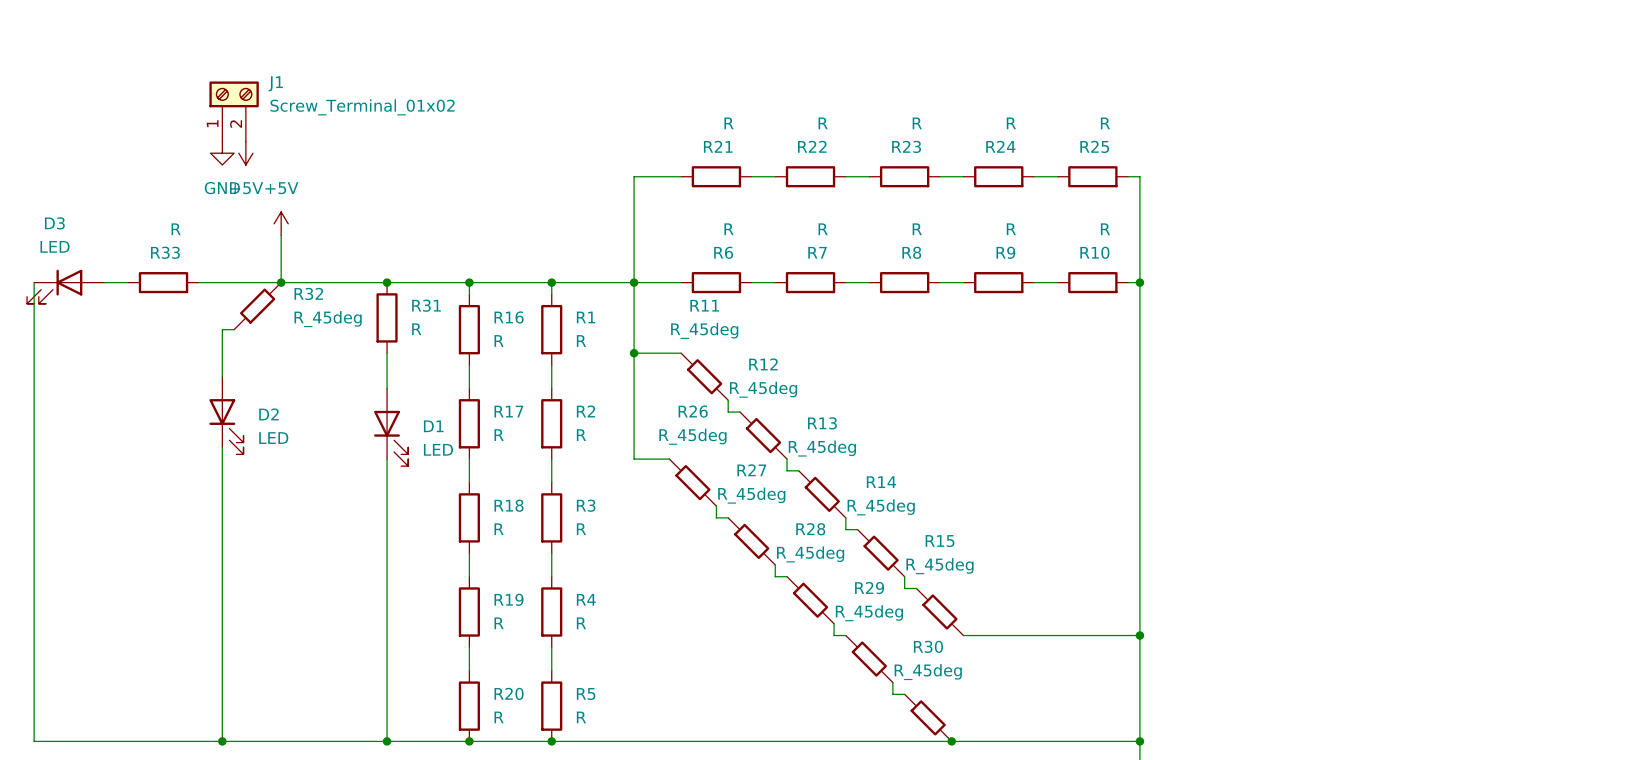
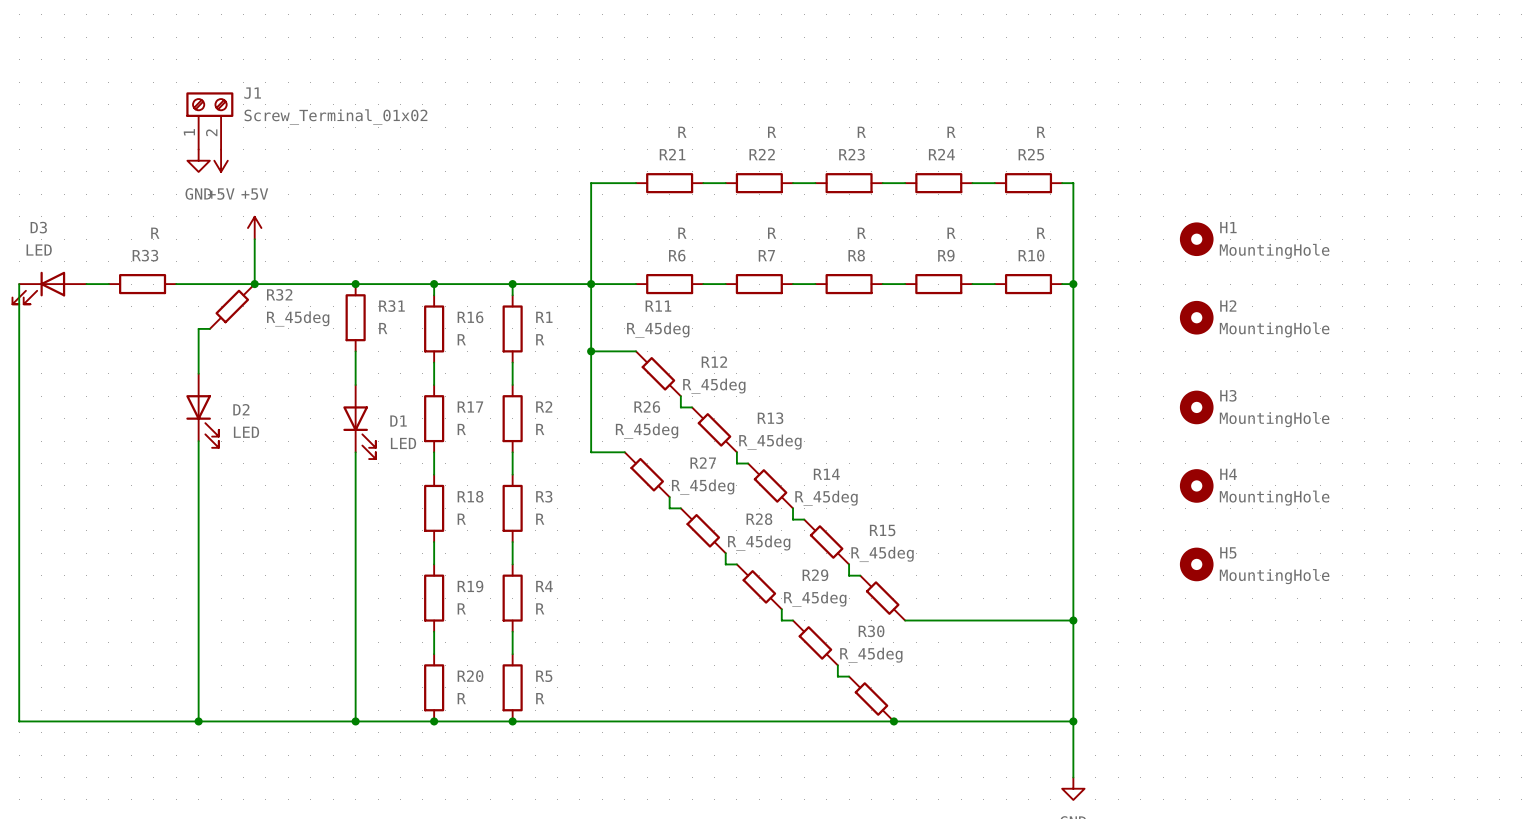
H1: none -> MountingHole (1196, 239)
H2: none -> MountingHole (1196, 317)
H3: none -> MountingHole (1196, 407)
H4: none -> MountingHole (1196, 485)
H5: none -> MountingHole (1196, 564)

